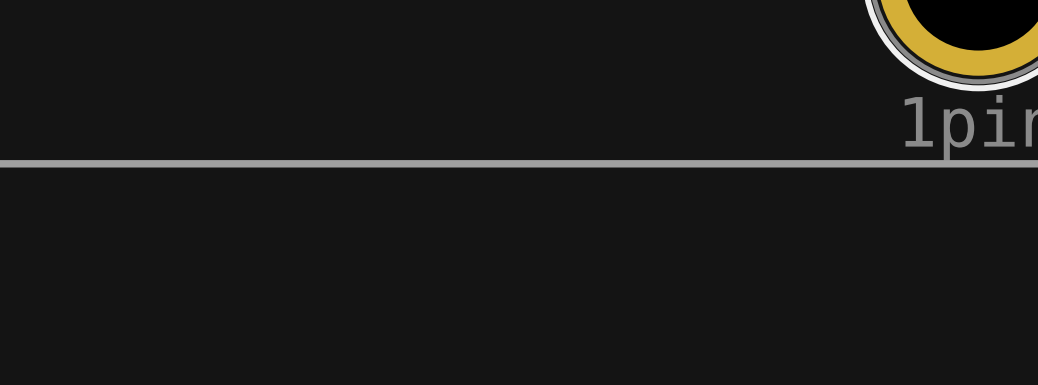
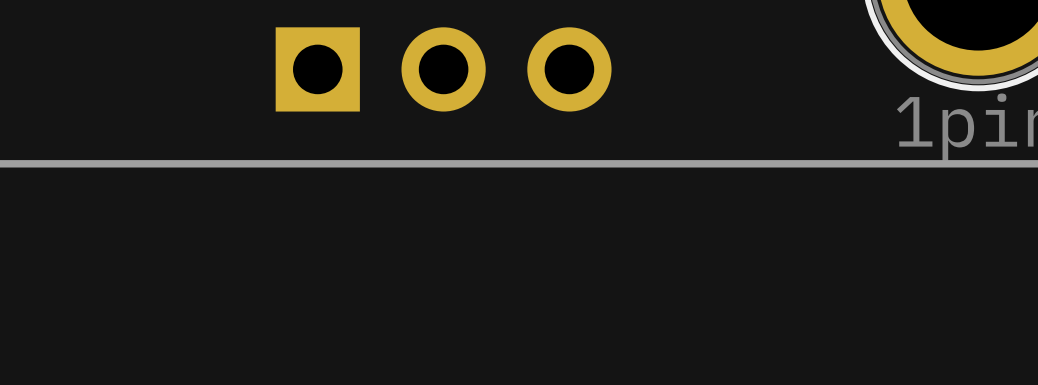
part: none -> (443, 69)

